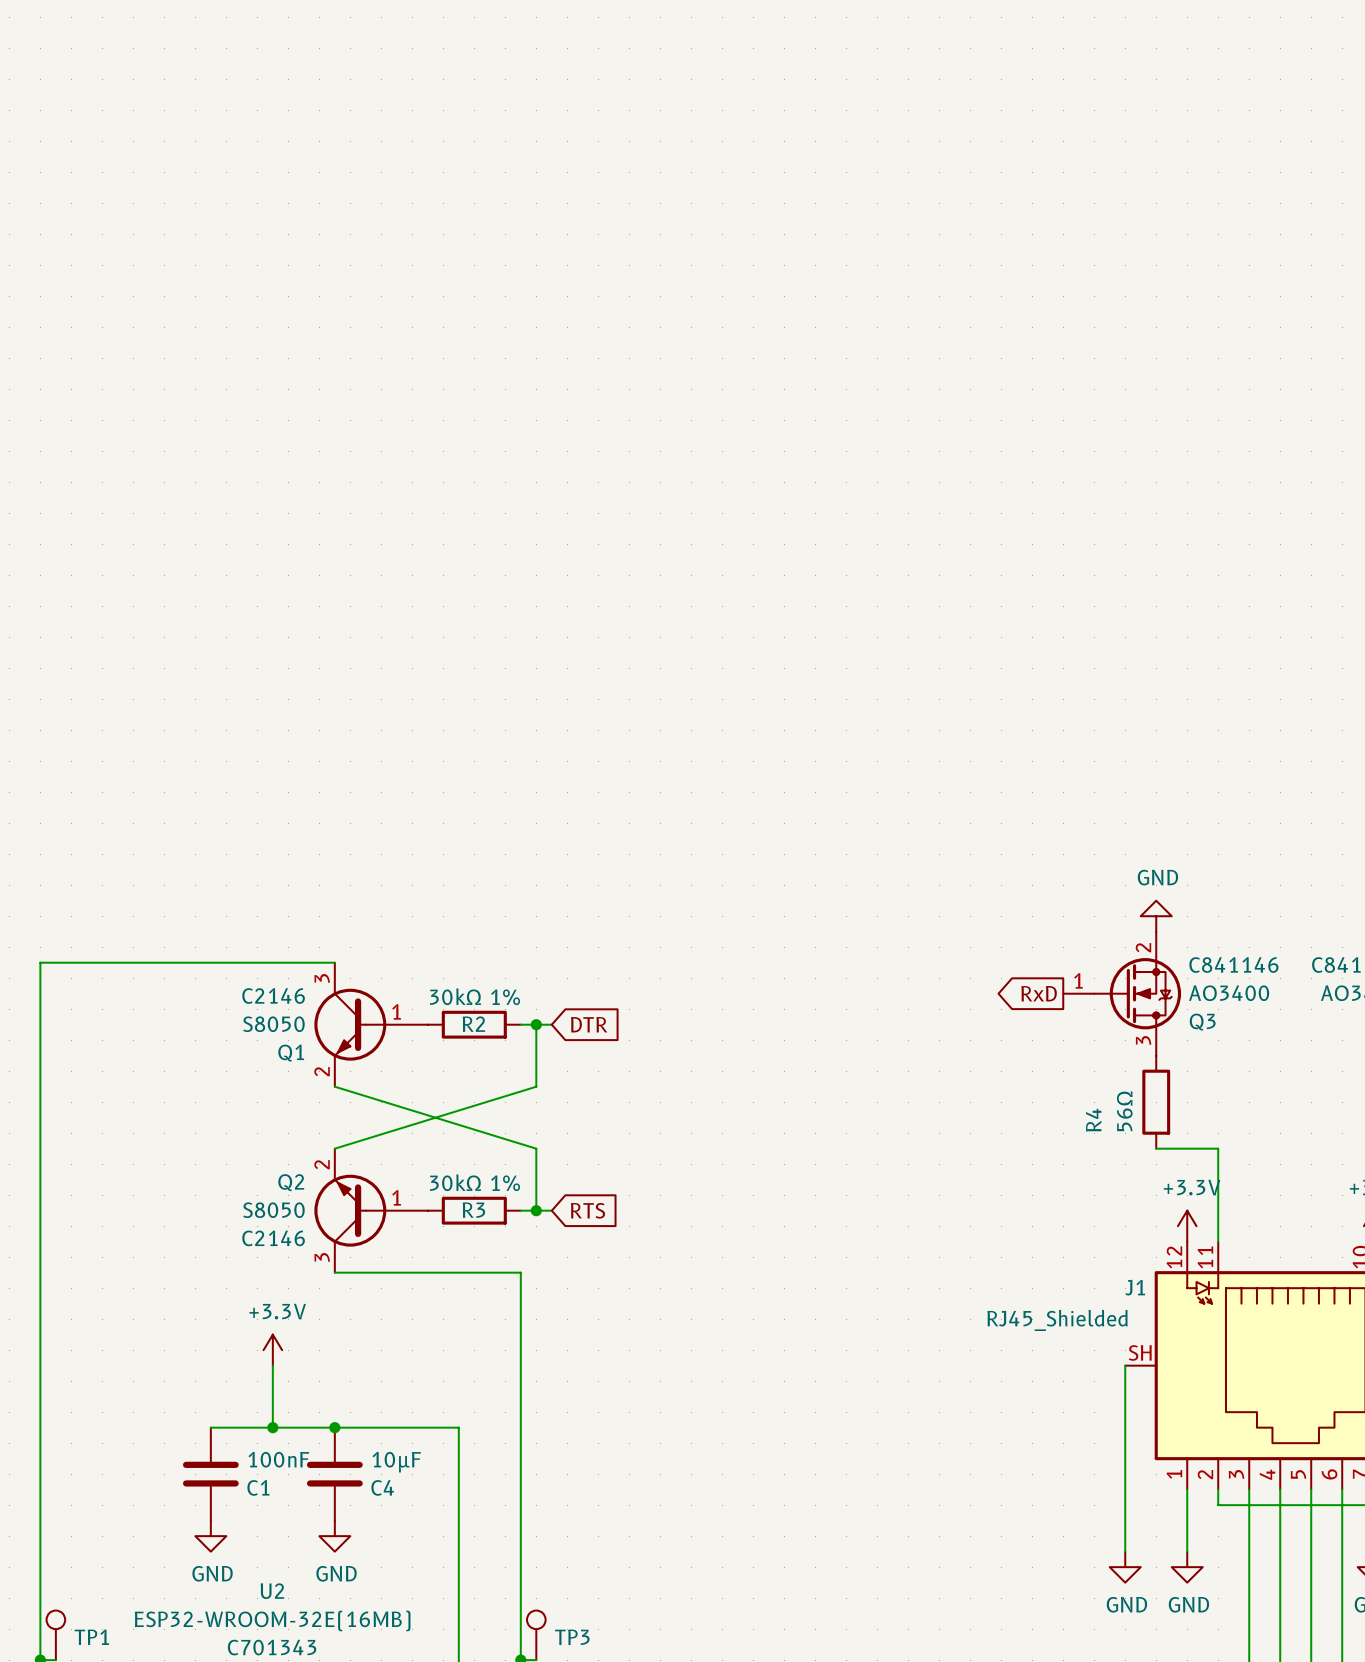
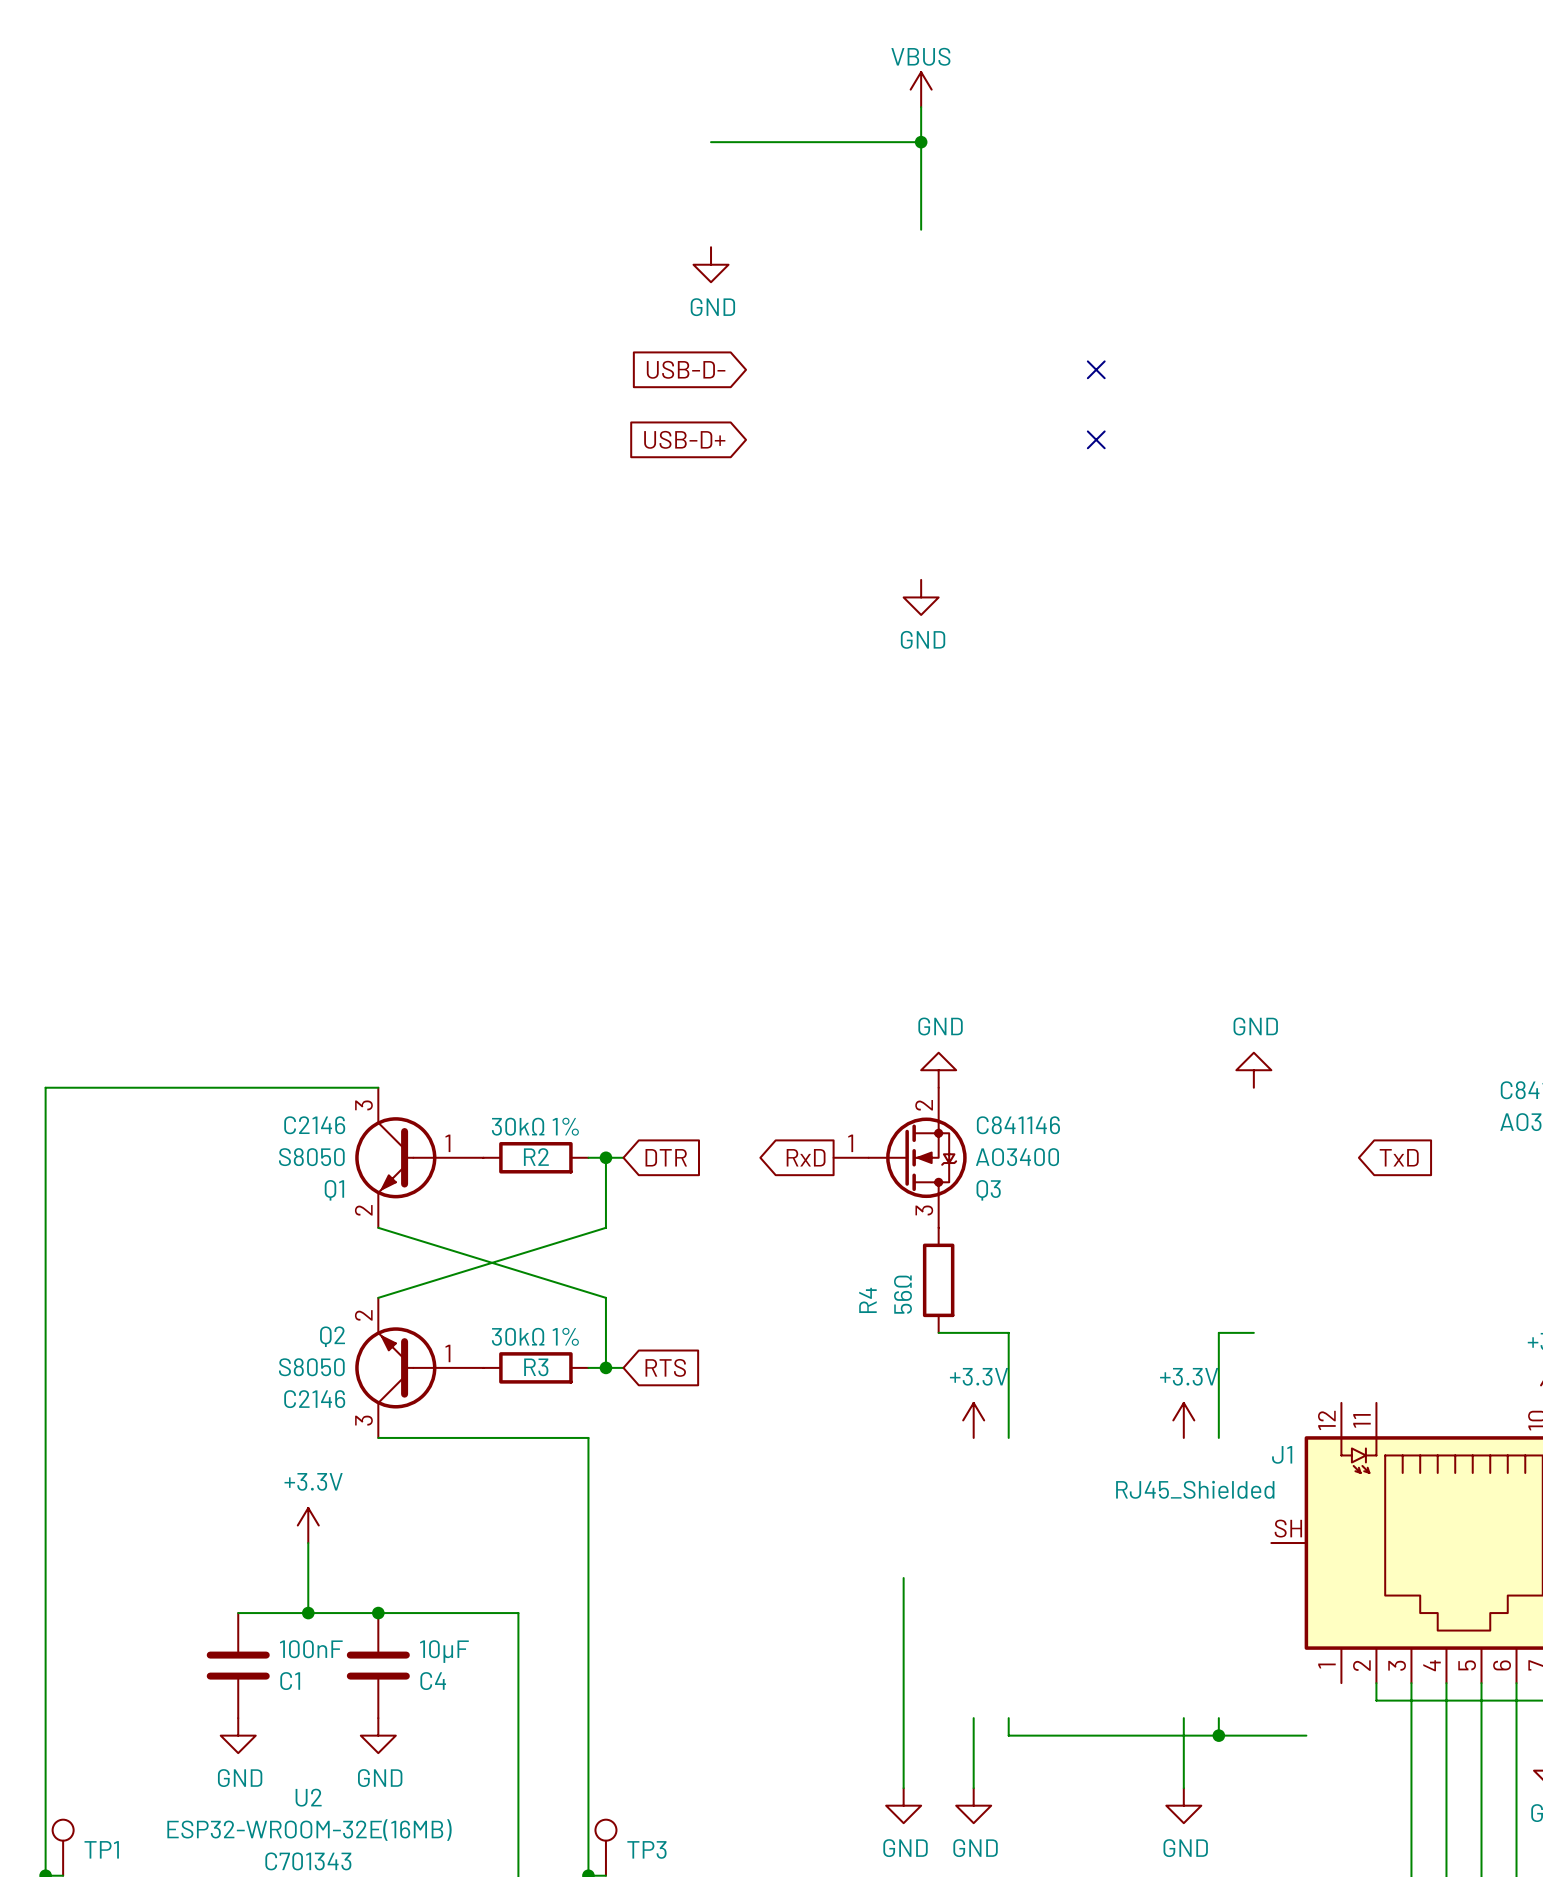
power symbol: none -> VBUS (921, 89)
wire: none -> (921, 107) (921, 229)
wire: none -> (711, 142) (921, 142)
junction: none -> (921, 142)
power symbol: none -> GND (711, 264)
global label: none -> USB-D- (686, 369)
no-connect mark: none -> (1096, 369)
global label: none -> USB-D+ (684, 439)
no-connect mark: none -> (1096, 439)
power symbol: none -> GND (921, 597)
power symbol position: GND (1156, 916) -> GND (1253, 1070)
power symbol: none -> GND (938, 1070)
global label: RxD (1039, 993) -> none
Q3 position: (1122, 993) -> (900, 1157)
global label: none -> RxD (806, 1157)
global label: none -> TxD (1399, 1157)
R4 position: (1156, 1102) -> (938, 1280)
wire: (1156, 1148) (1218, 1148) (1218, 1241) -> none
wire: none -> (938, 1332) (1008, 1332) (1008, 1437)
wire: none -> (1253, 1332) (1218, 1332) (1218, 1437)
power symbol position: +3.3V (1187, 1226) -> +3.3V (1183, 1420)
power symbol: none -> +3.3V (973, 1420)
wire: (1125, 1365) (1125, 1551) -> none
wire: none -> (903, 1578) (903, 1788)
wire: (1187, 1489) (1187, 1551) -> (1183, 1718) (1183, 1788)
wire: none -> (973, 1718) (973, 1788)
wire: none -> (1008, 1718) (1008, 1735) (1306, 1735)
wire: none -> (1218, 1718) (1218, 1735)
junction: none -> (1218, 1735)
power symbol: GND (1125, 1567) -> none
power symbol: GND (1187, 1567) -> none
power symbol: none -> GND (903, 1805)
power symbol: none -> GND (973, 1805)
power symbol: none -> GND (1183, 1805)

